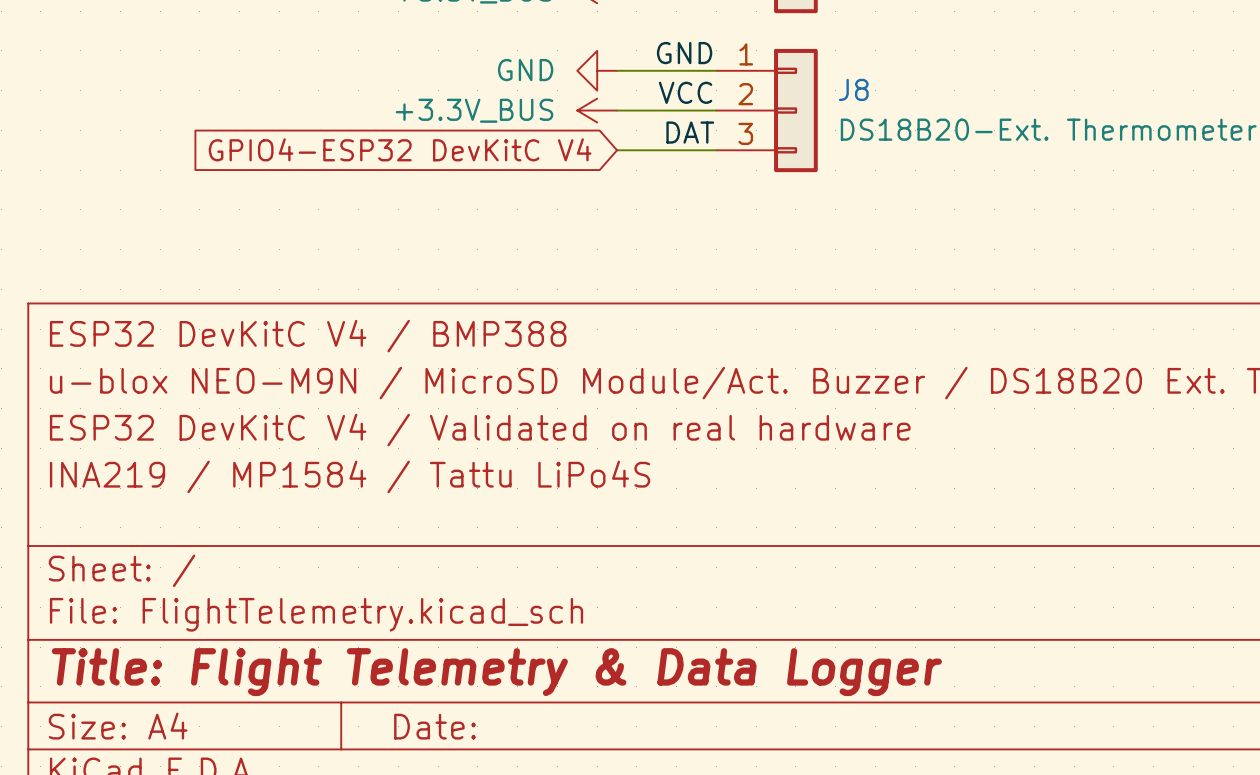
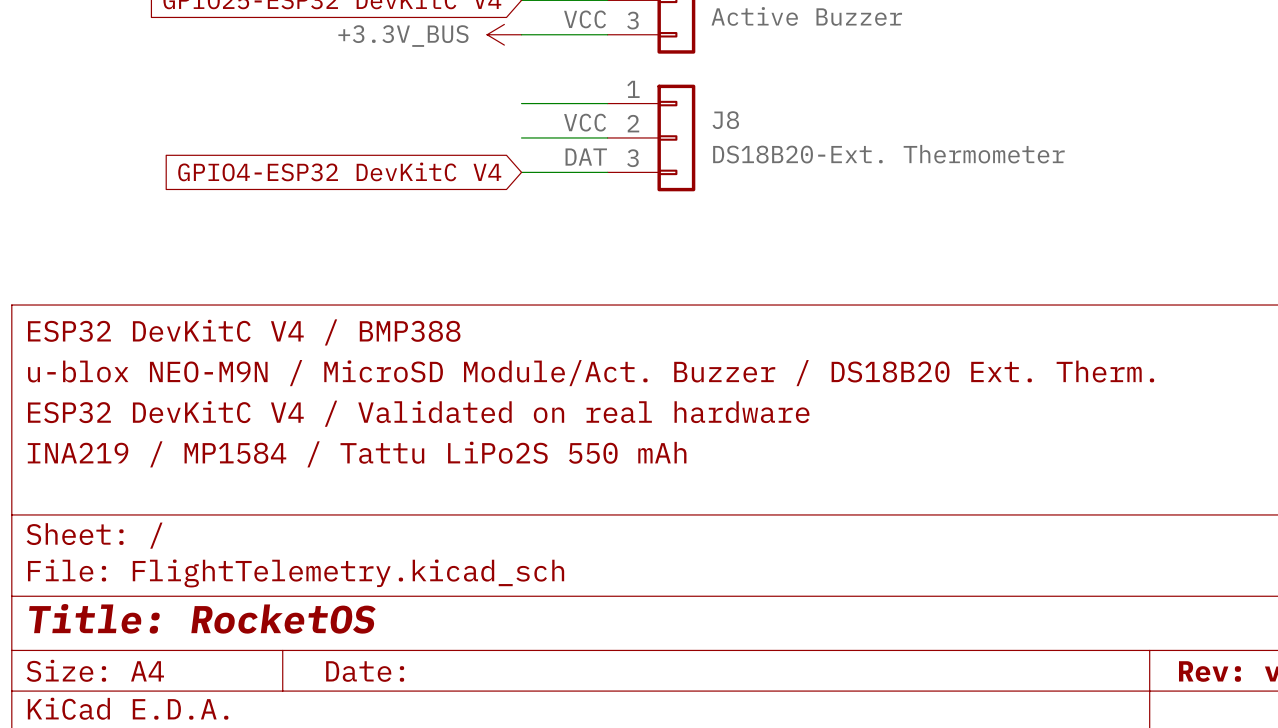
label: GND (684, 53) -> none
power symbol: GND (597, 70) -> none
power symbol: +3.3V_BUS (597, 110) -> none
title block: INA219 / MP1584 / Tattu LiPo4S (350, 476) -> INA219 / MP1584 / Tattu LiPo2S 550 mAh (357, 454)
title block: Title: Flight Telemetry & Data Logger (496, 672) -> Title: RocketOS (202, 618)

